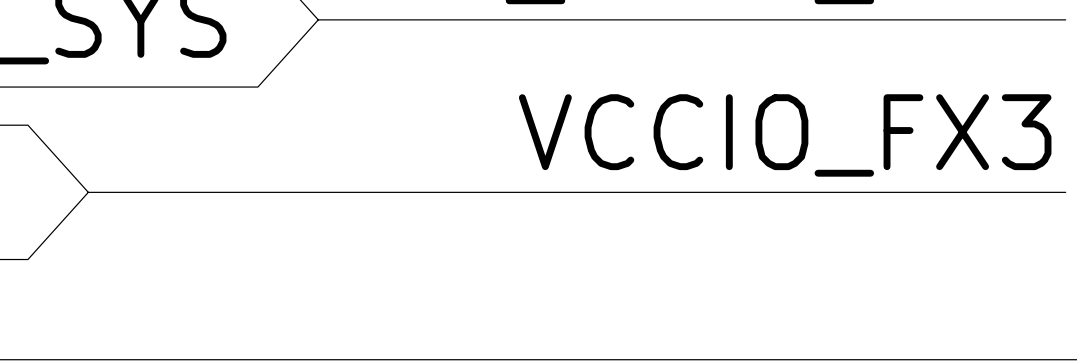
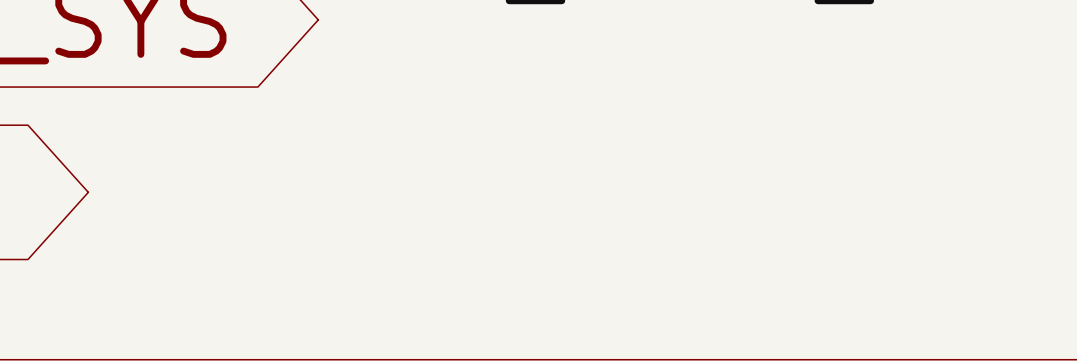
wire: (318, 19) (1065, 19) -> none
label: VCCIO_FX3 (785, 135) -> none
wire: (88, 192) (1065, 192) -> none

